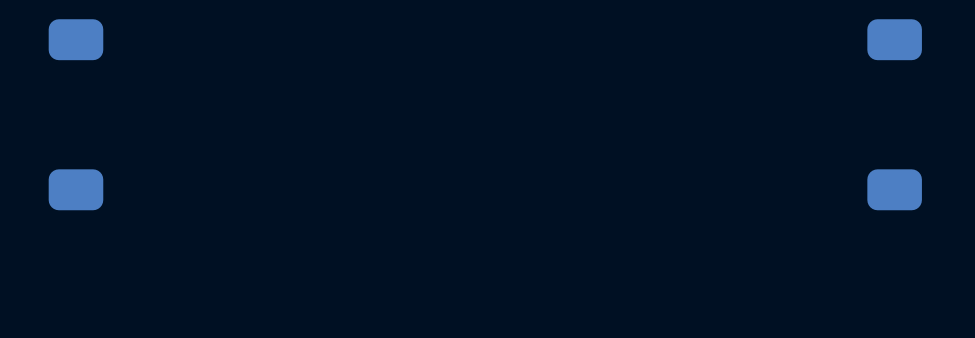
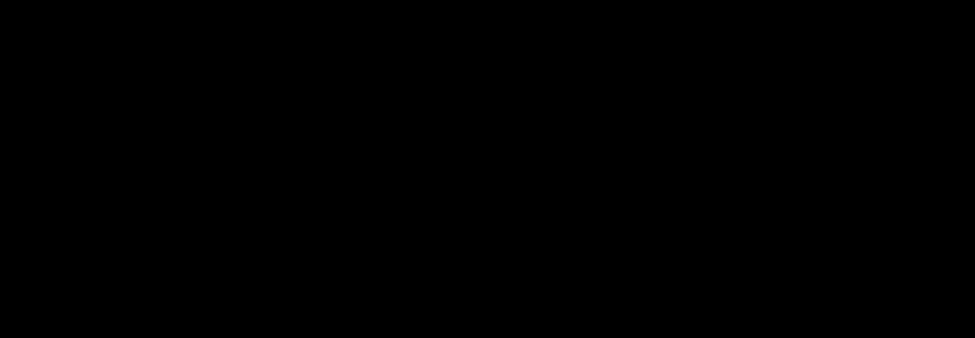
part: (75, 114) -> none
part: (894, 114) -> none

